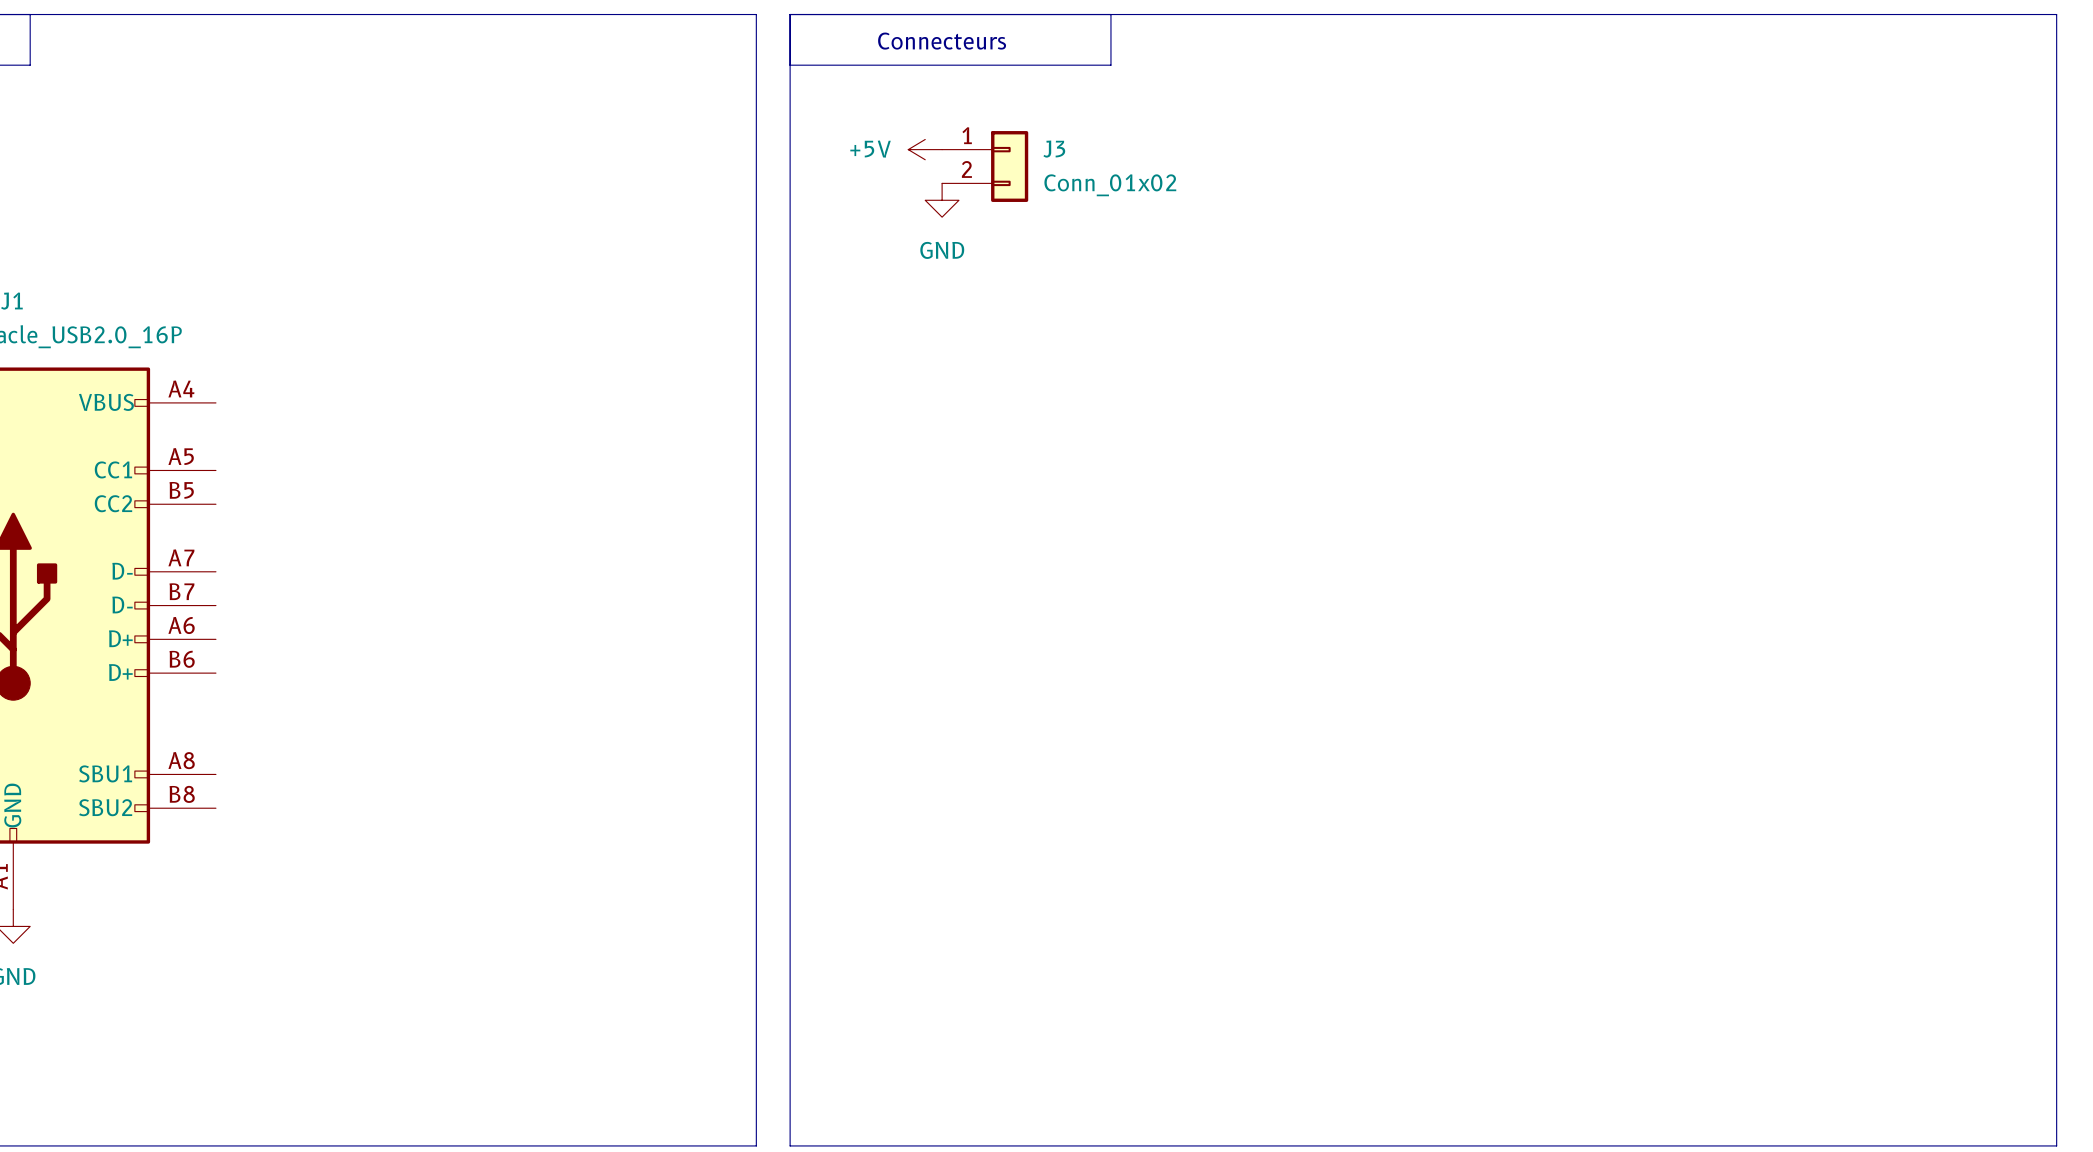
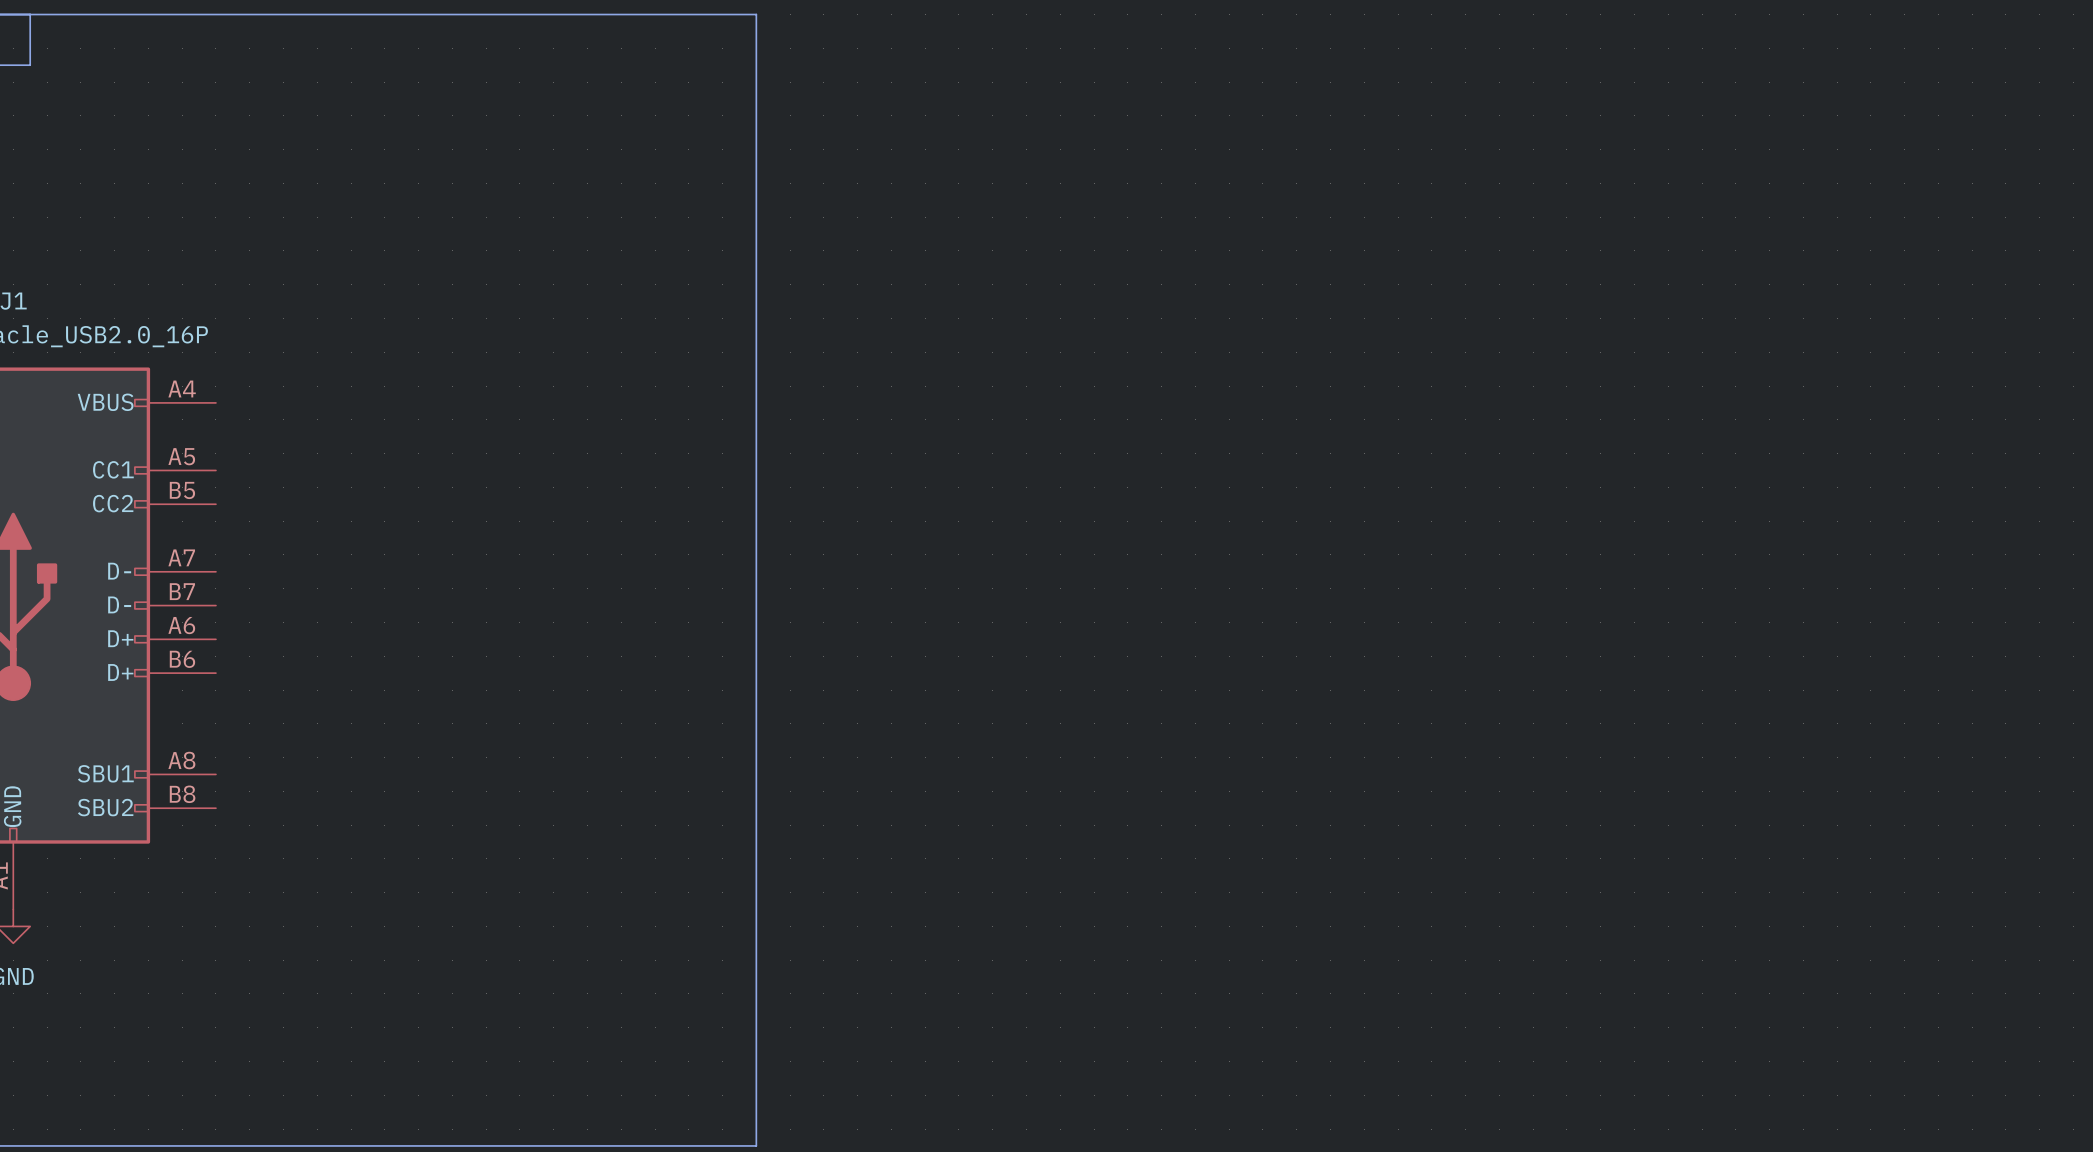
line: (790, 14) (2056, 14) (2056, 1145) (790, 1145) (790, 14) -> none
line: (1110, 14) (1110, 65) (790, 65) -> none
text: Connecteurs (942, 41) -> none
power symbol: +5V (925, 149) -> none
J3: Conn_01x02 (985, 166) -> none
power symbol: GND (942, 200) -> none

